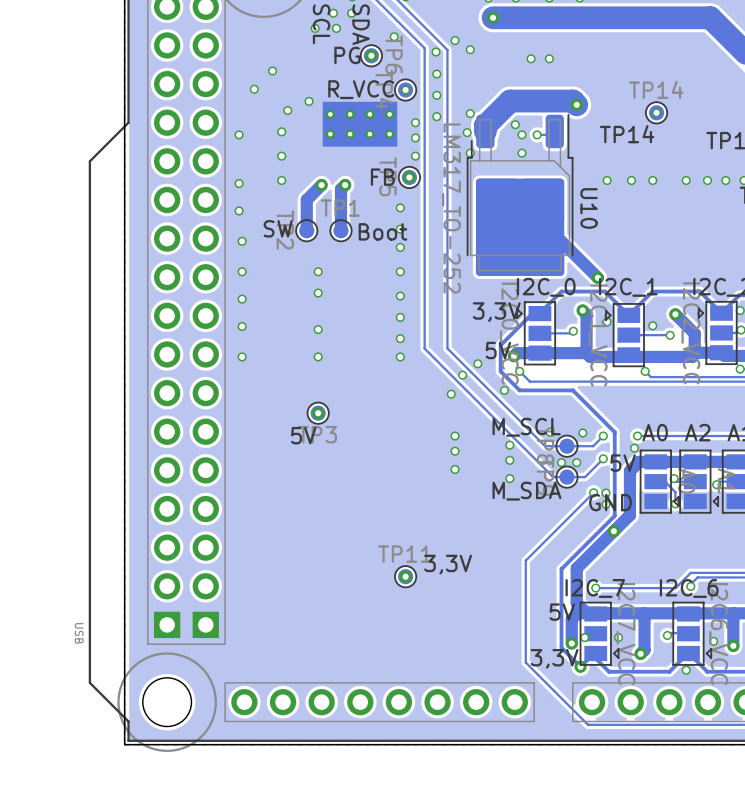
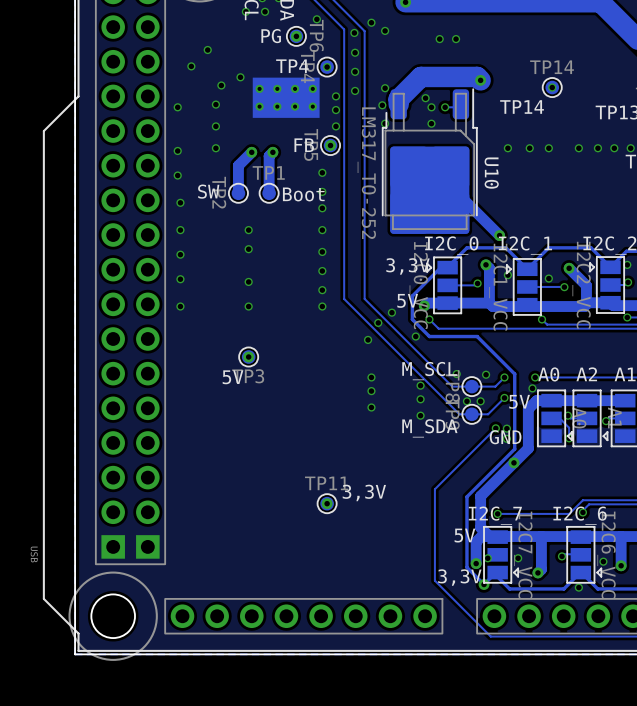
text: none -> TP4 (292, 66)
text: R_VCC (361, 89) -> none

